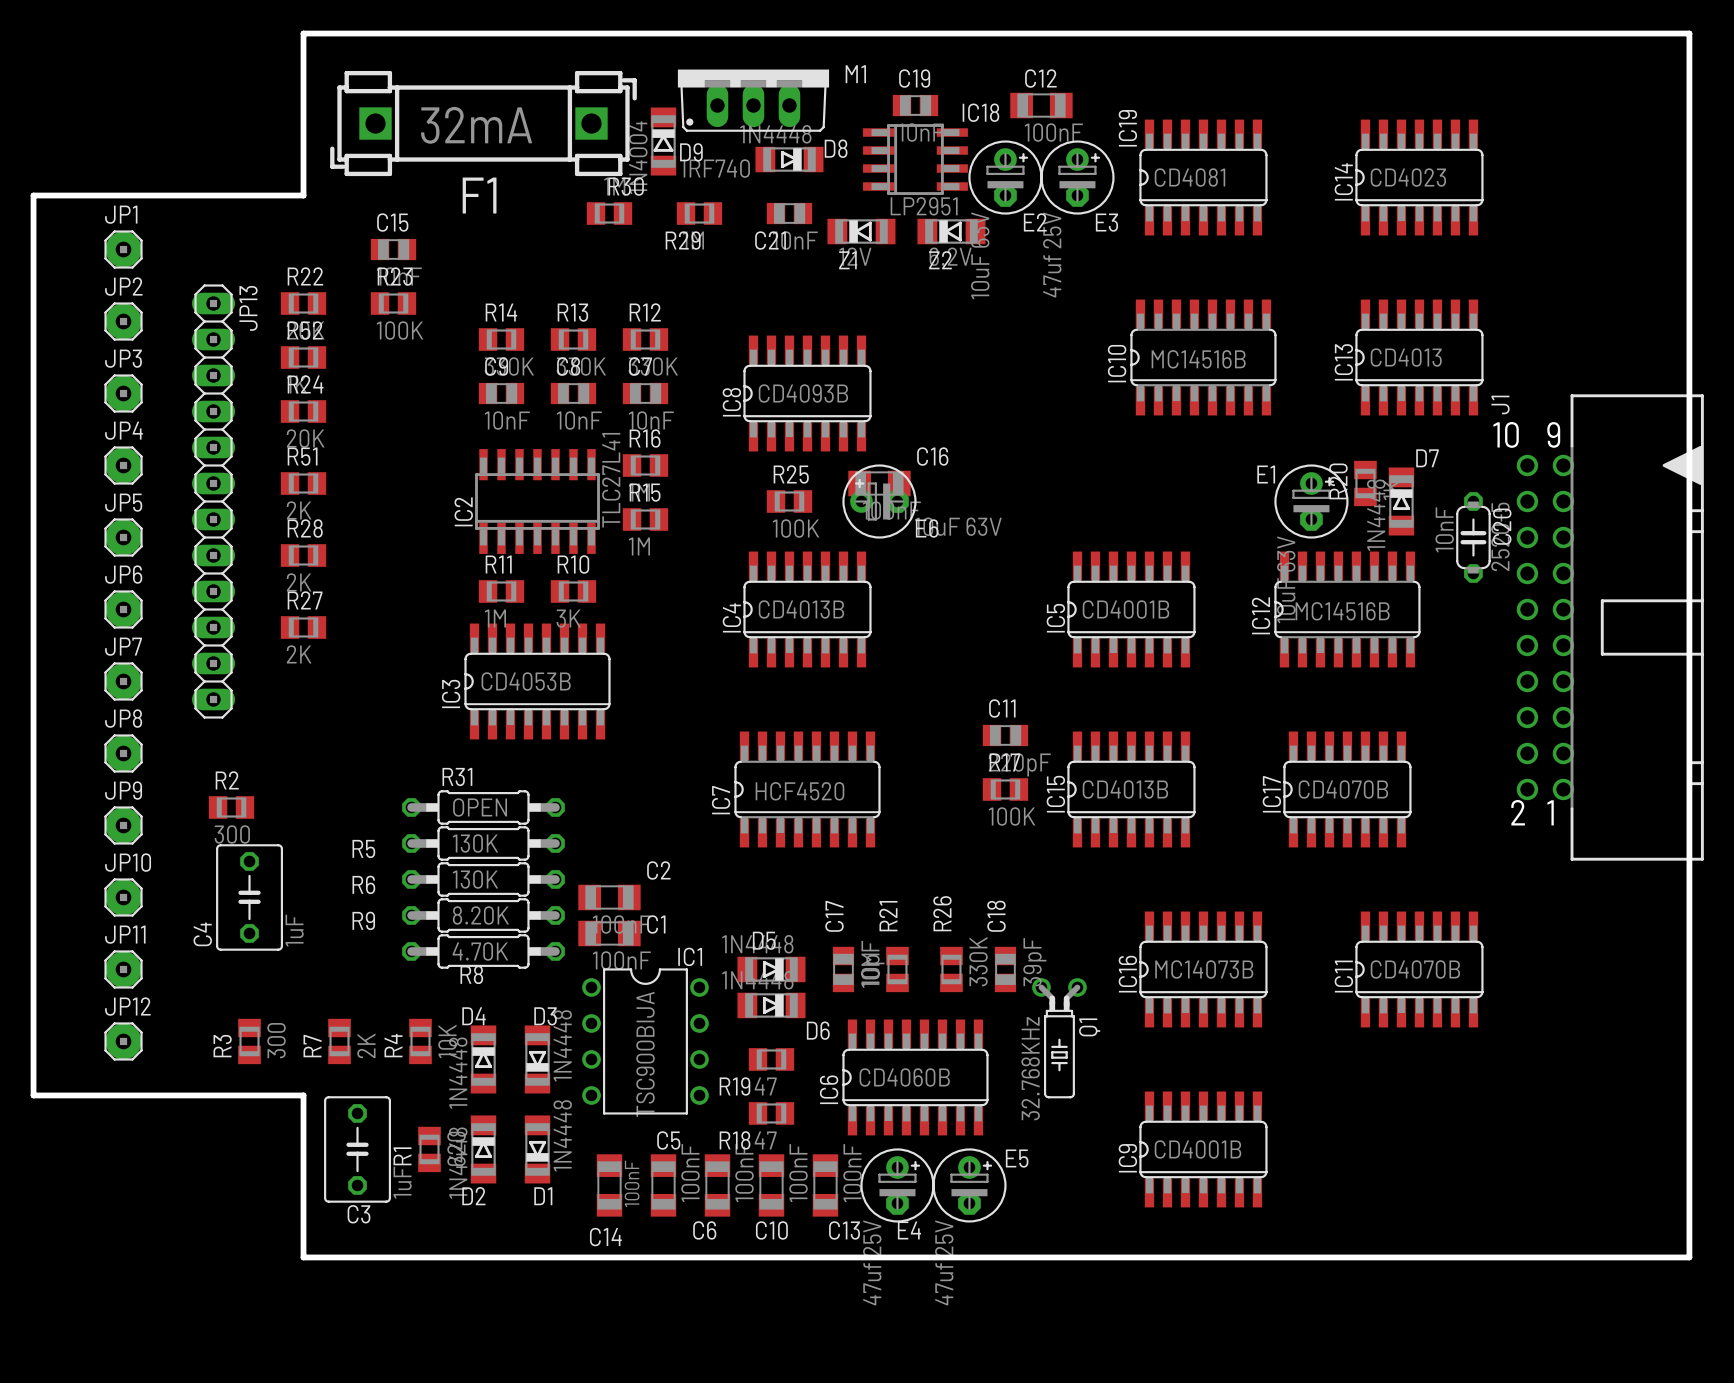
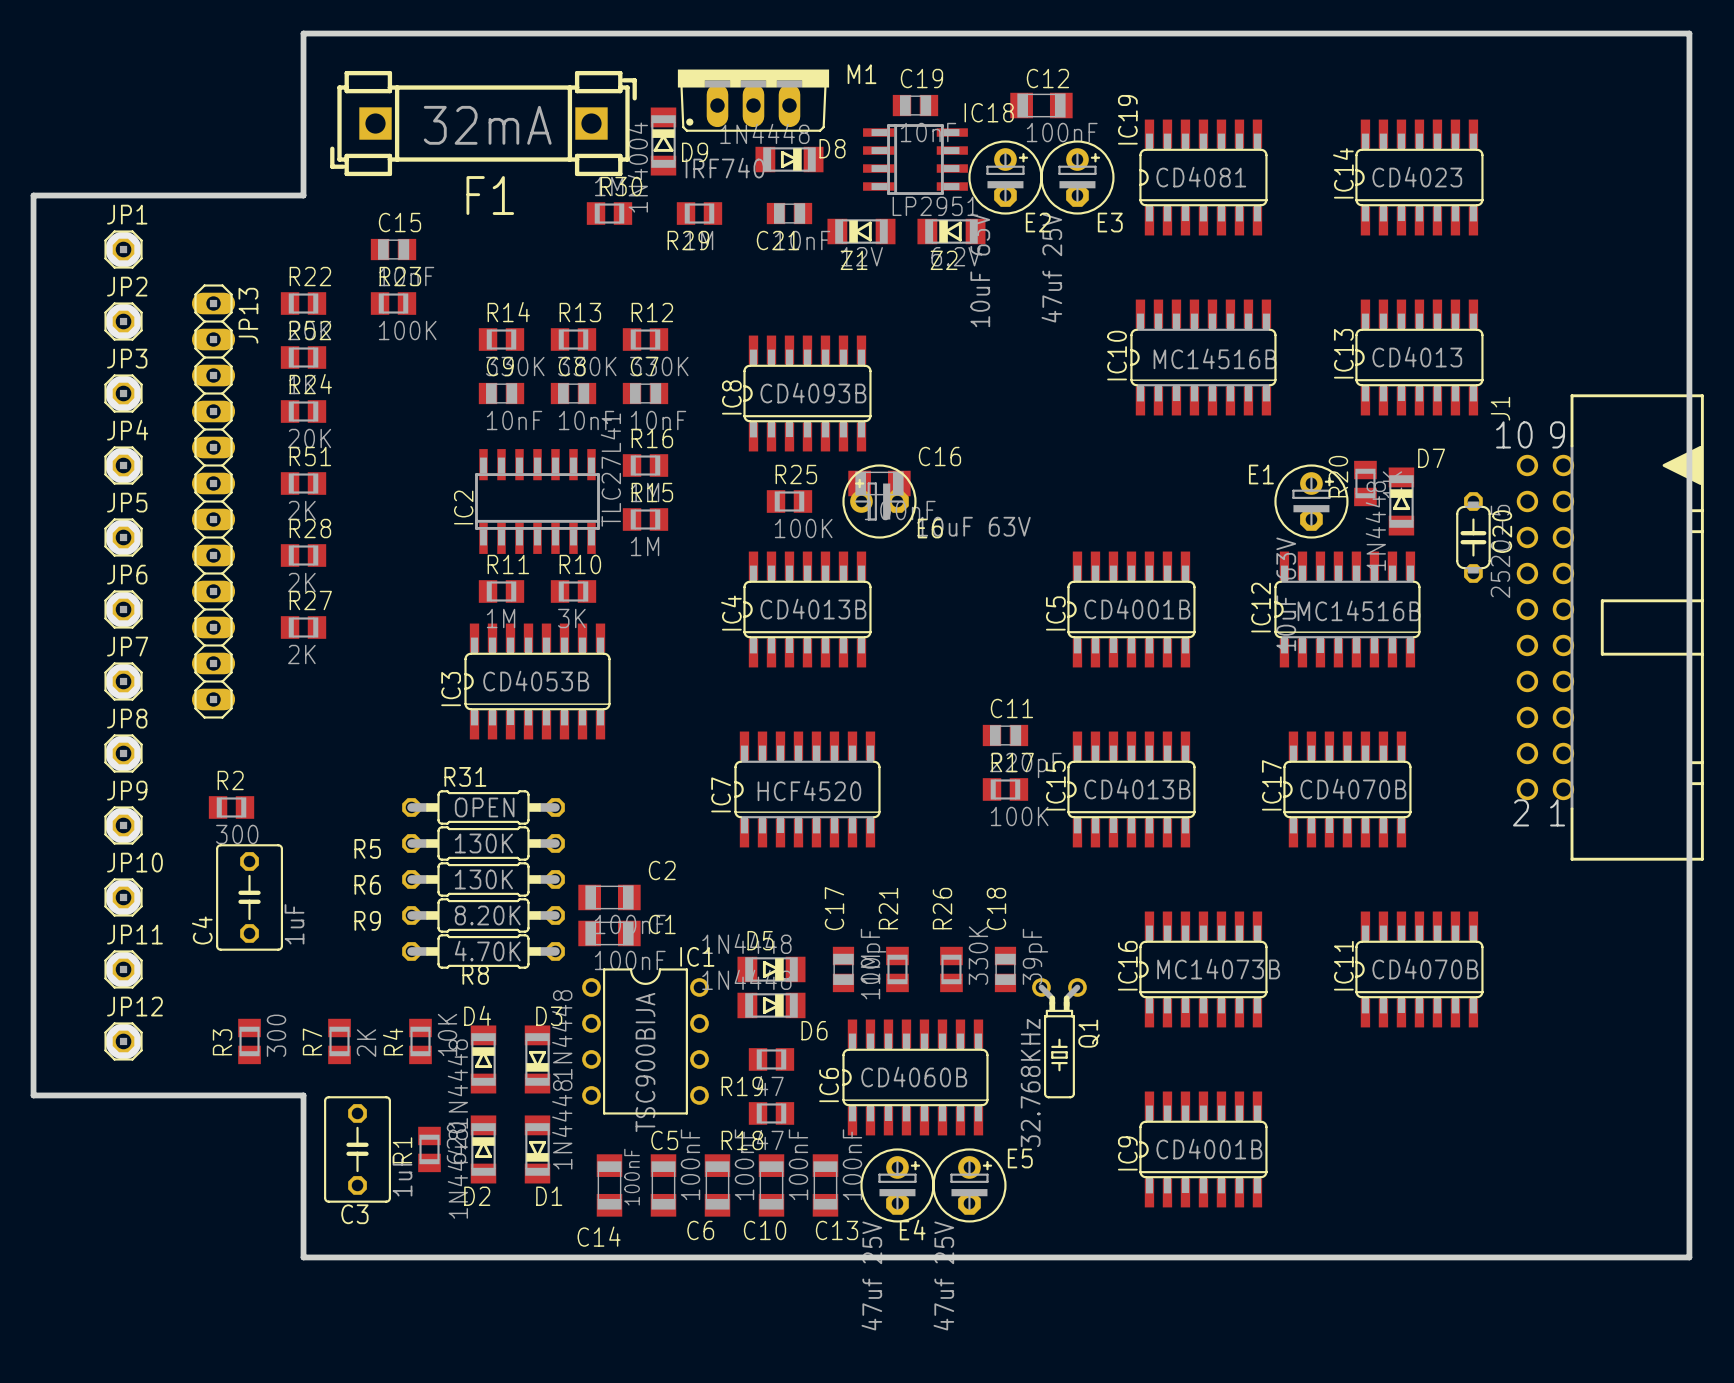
C20 value: 10nF (1444, 529) -> none

